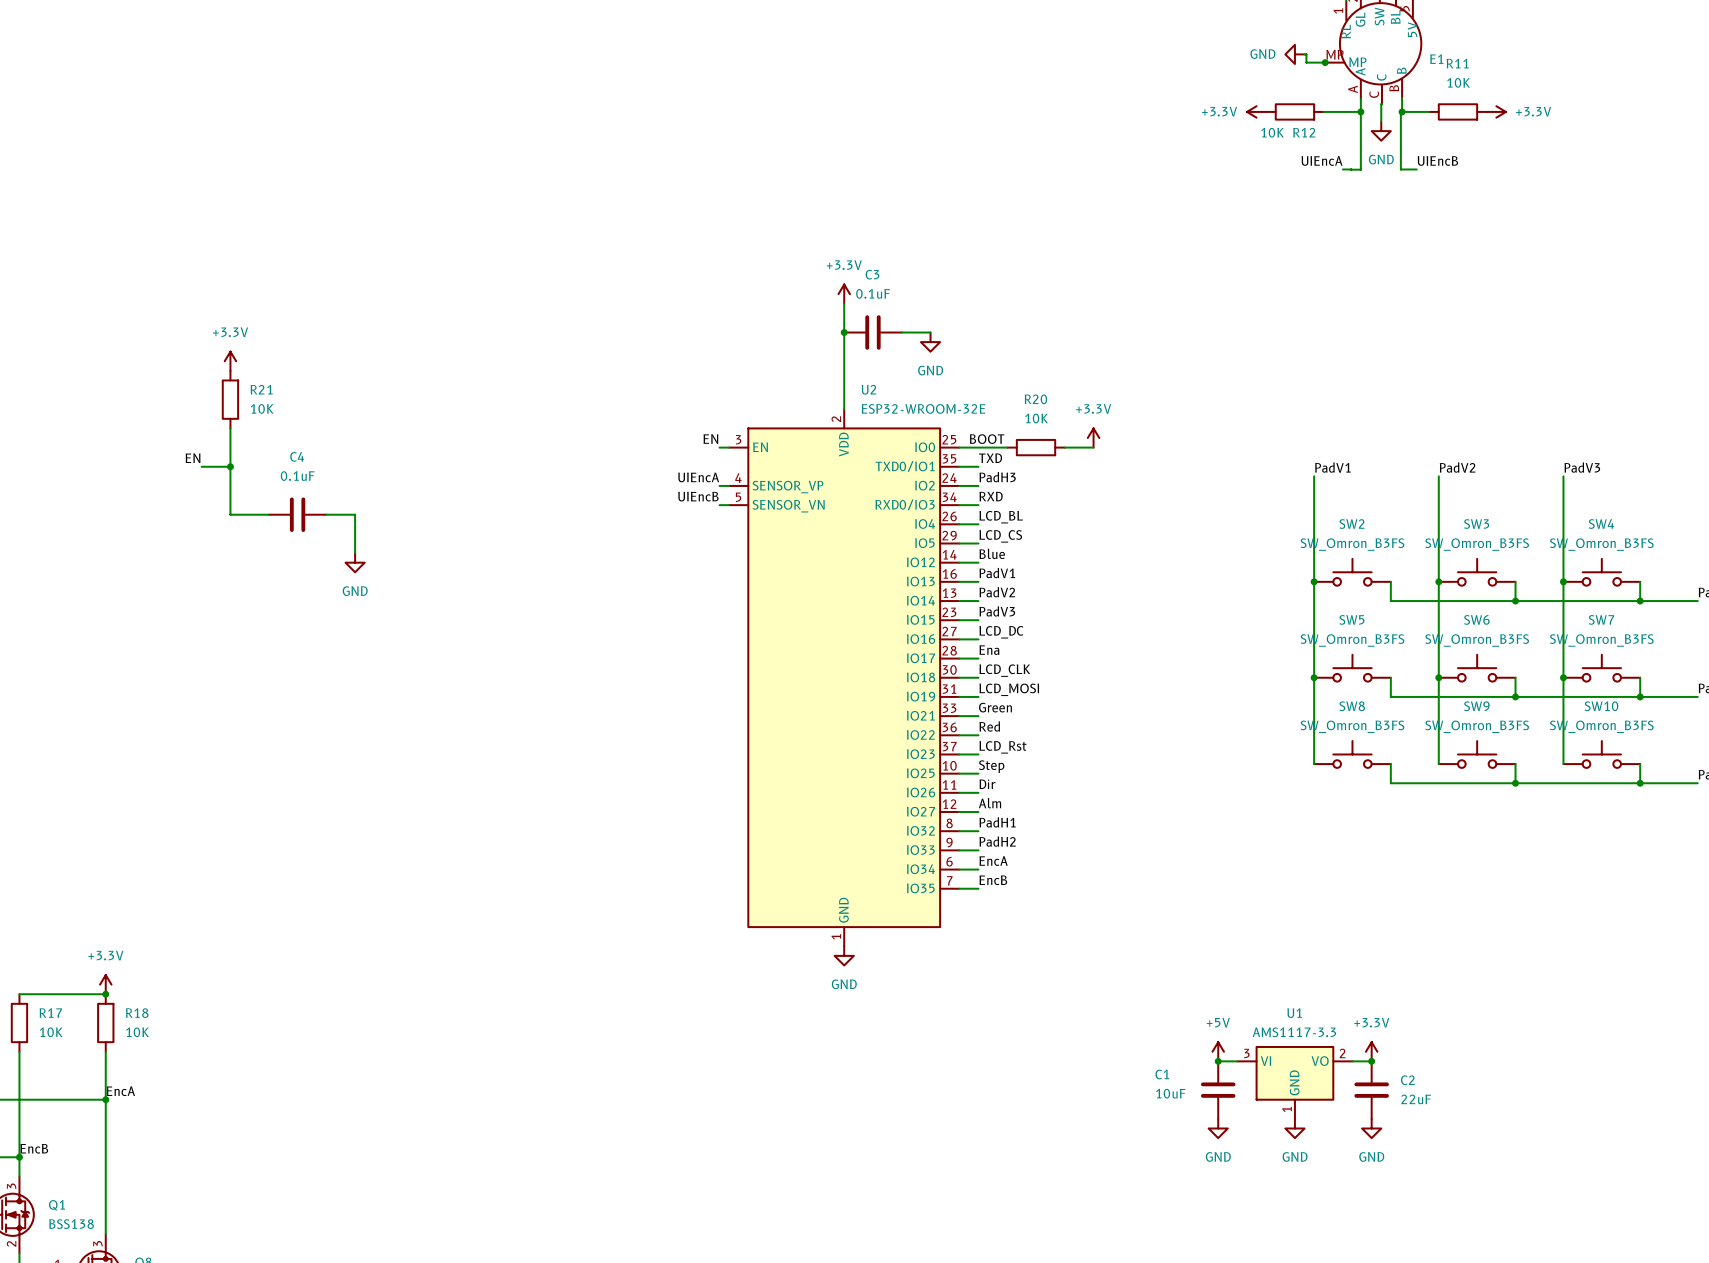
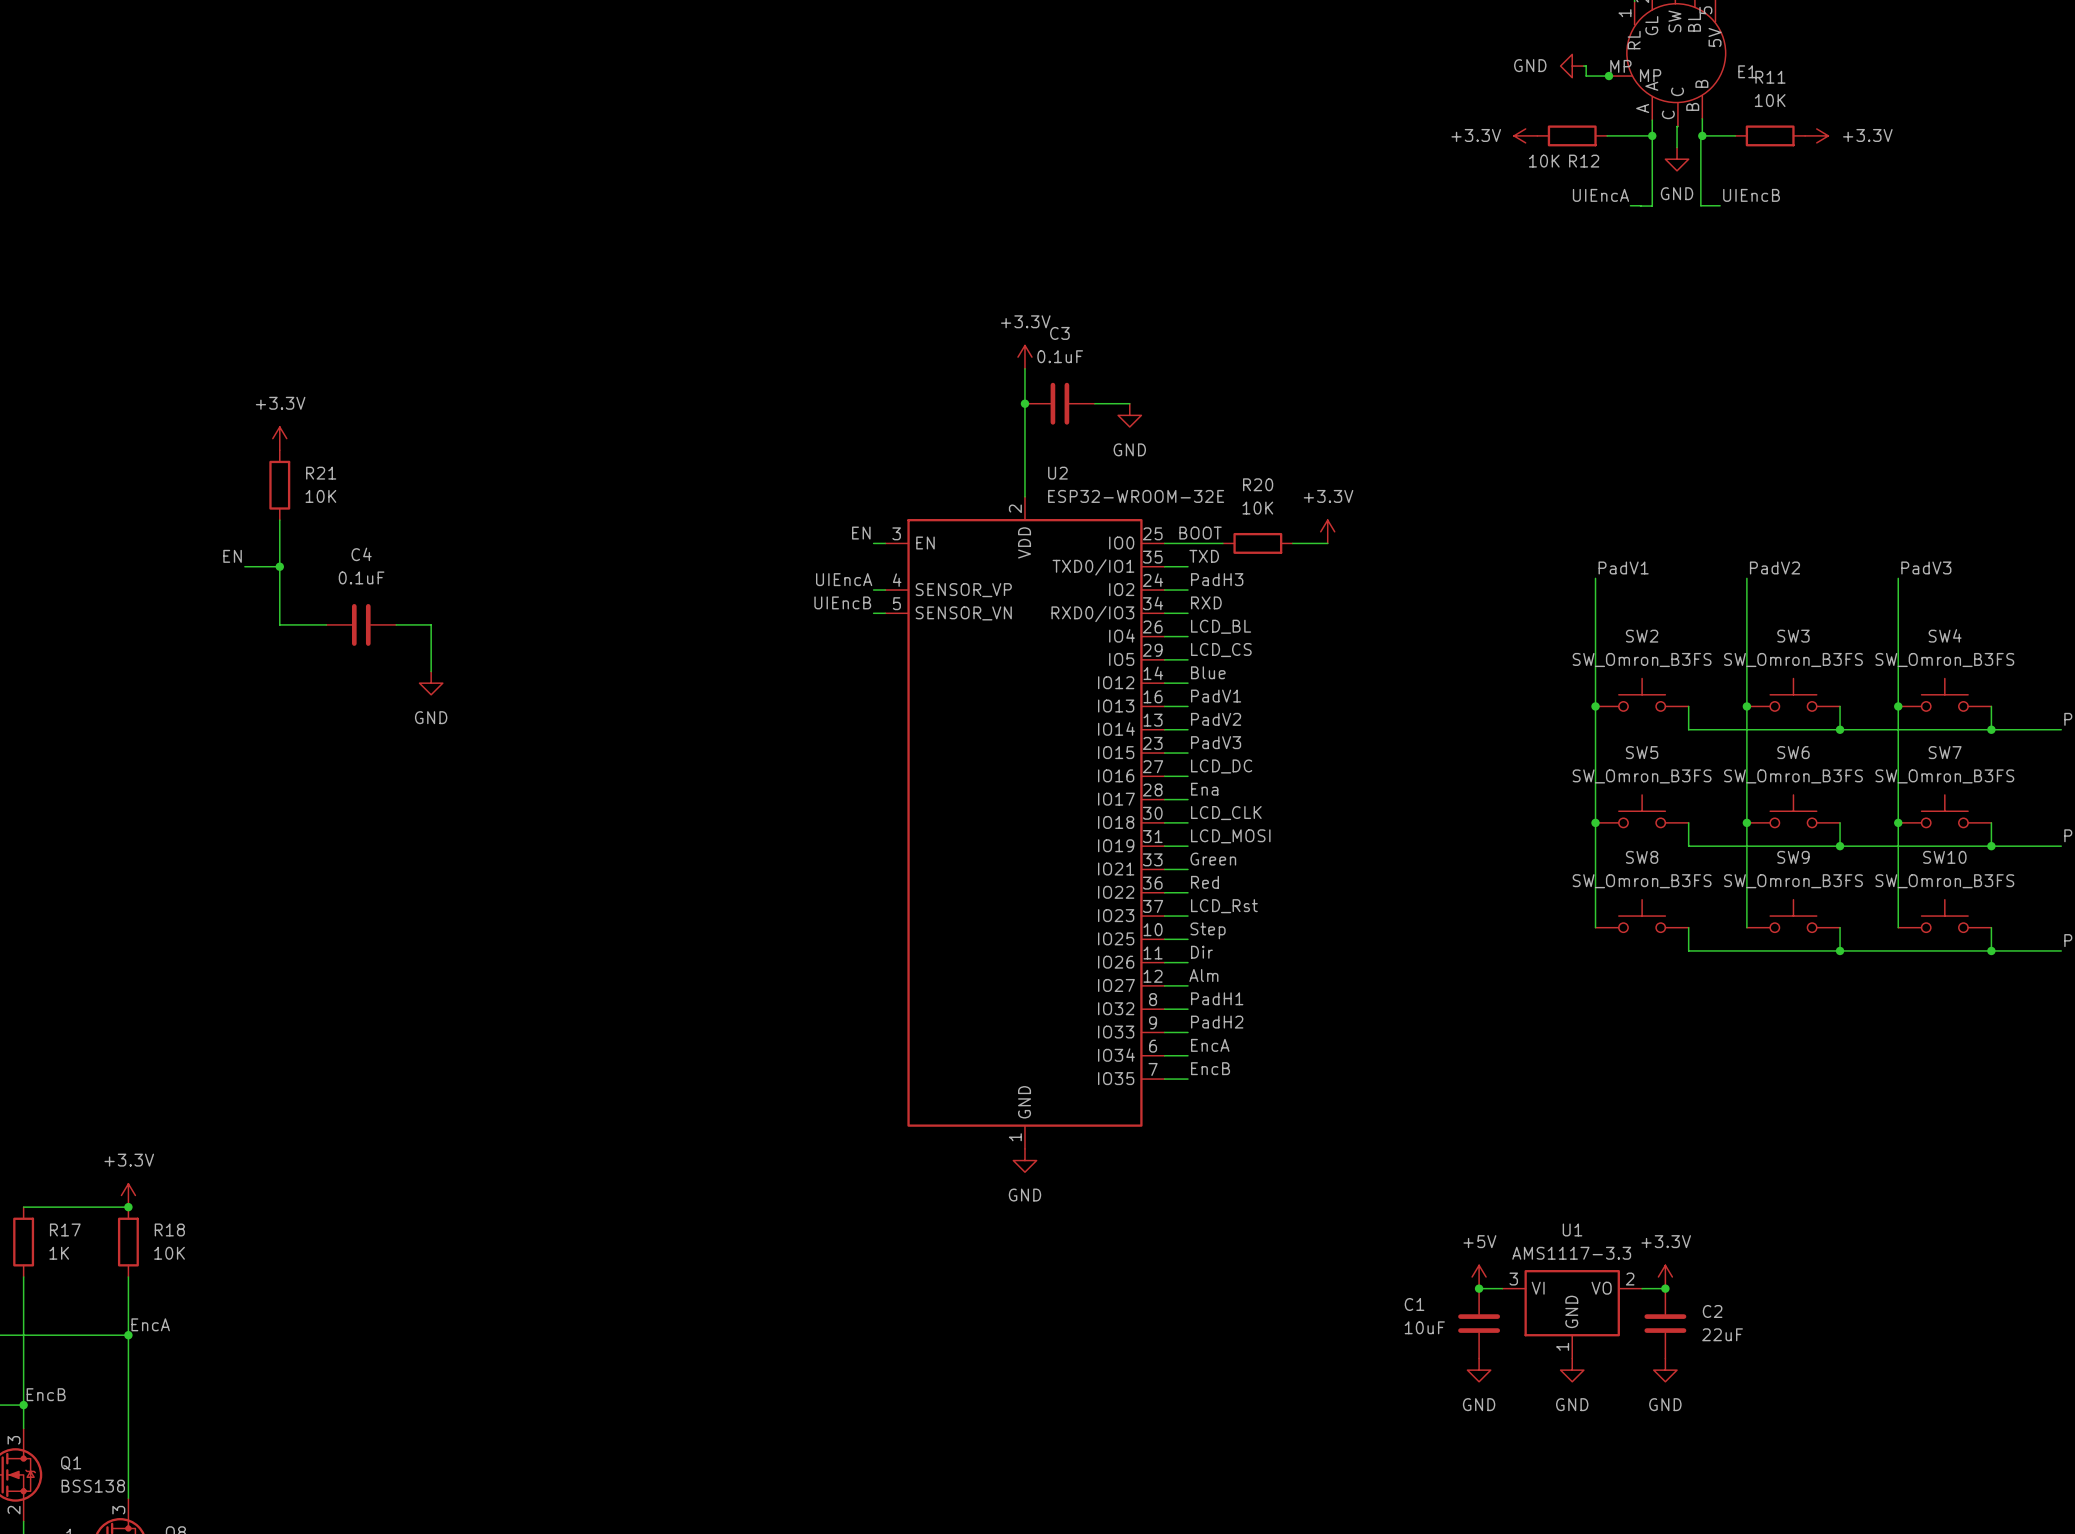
R17 value: 10K (51, 1032) -> 1K (59, 1253)

